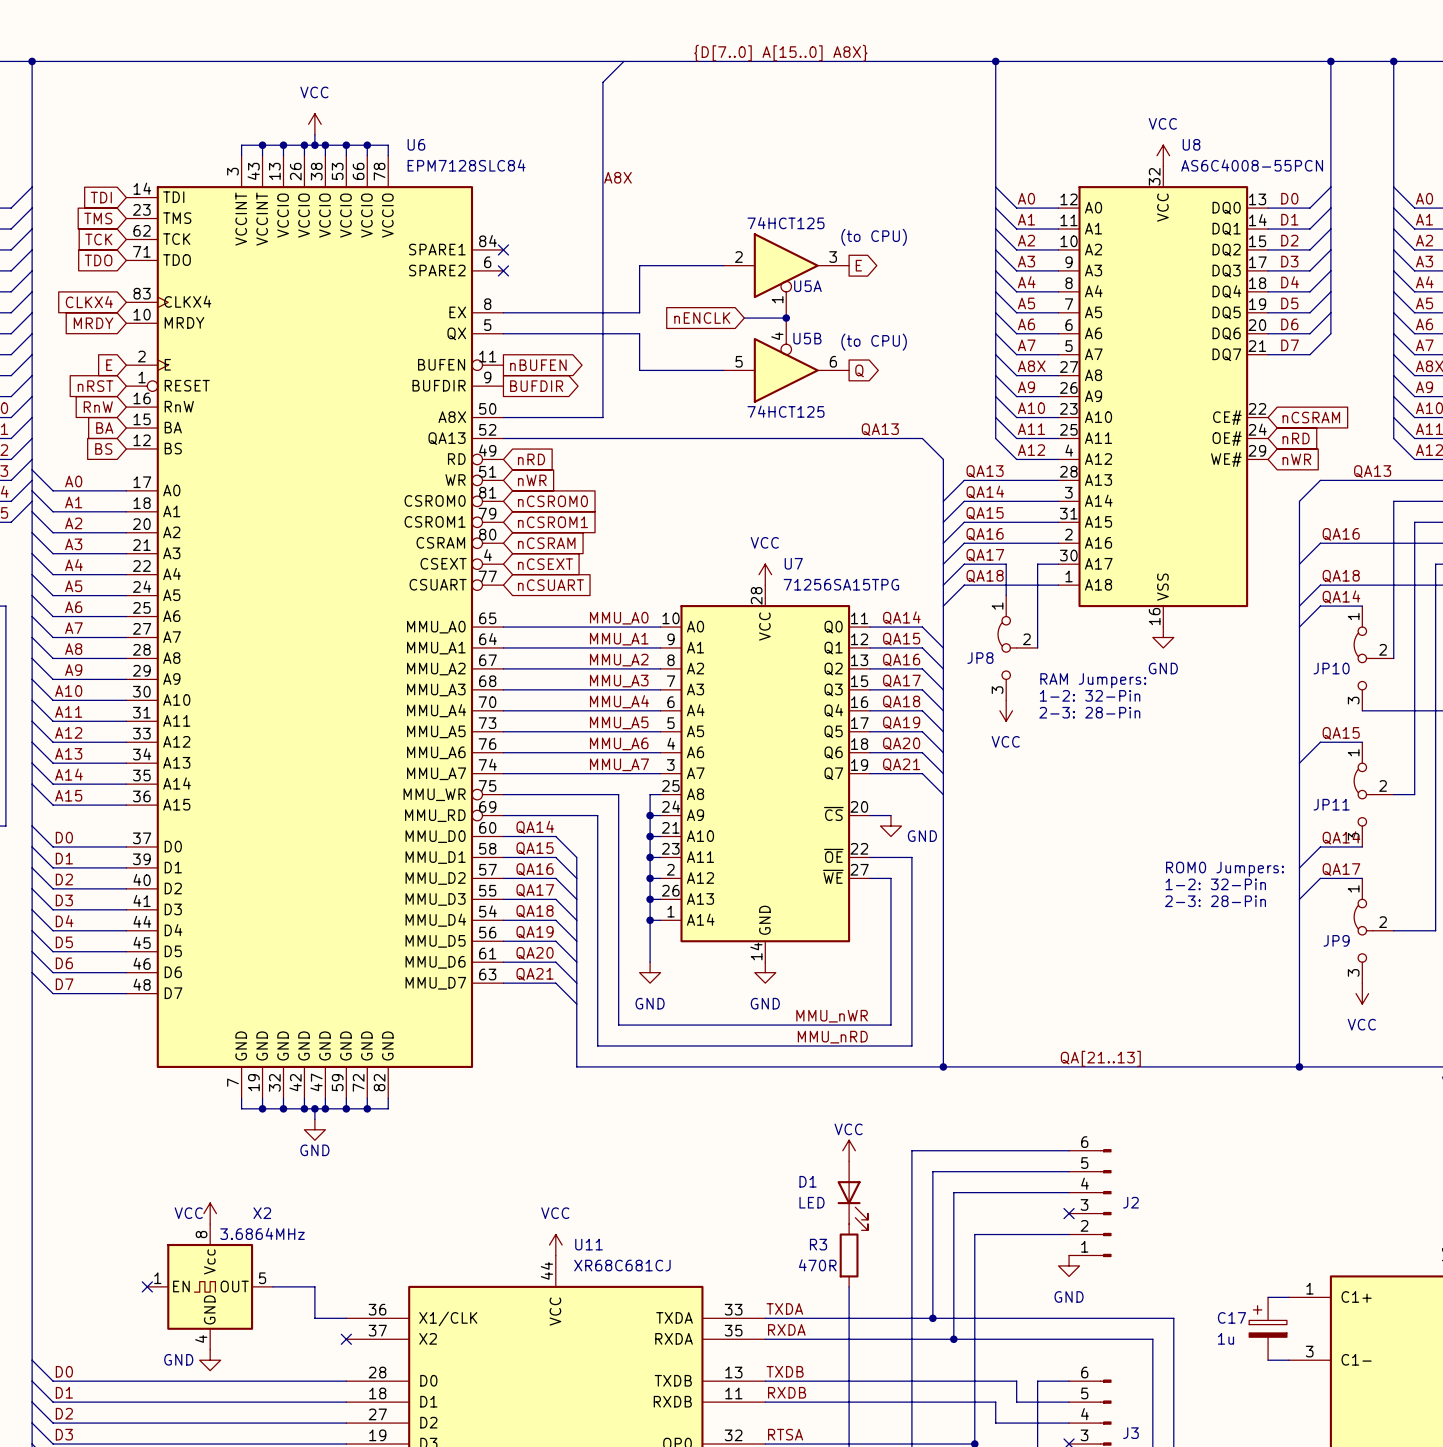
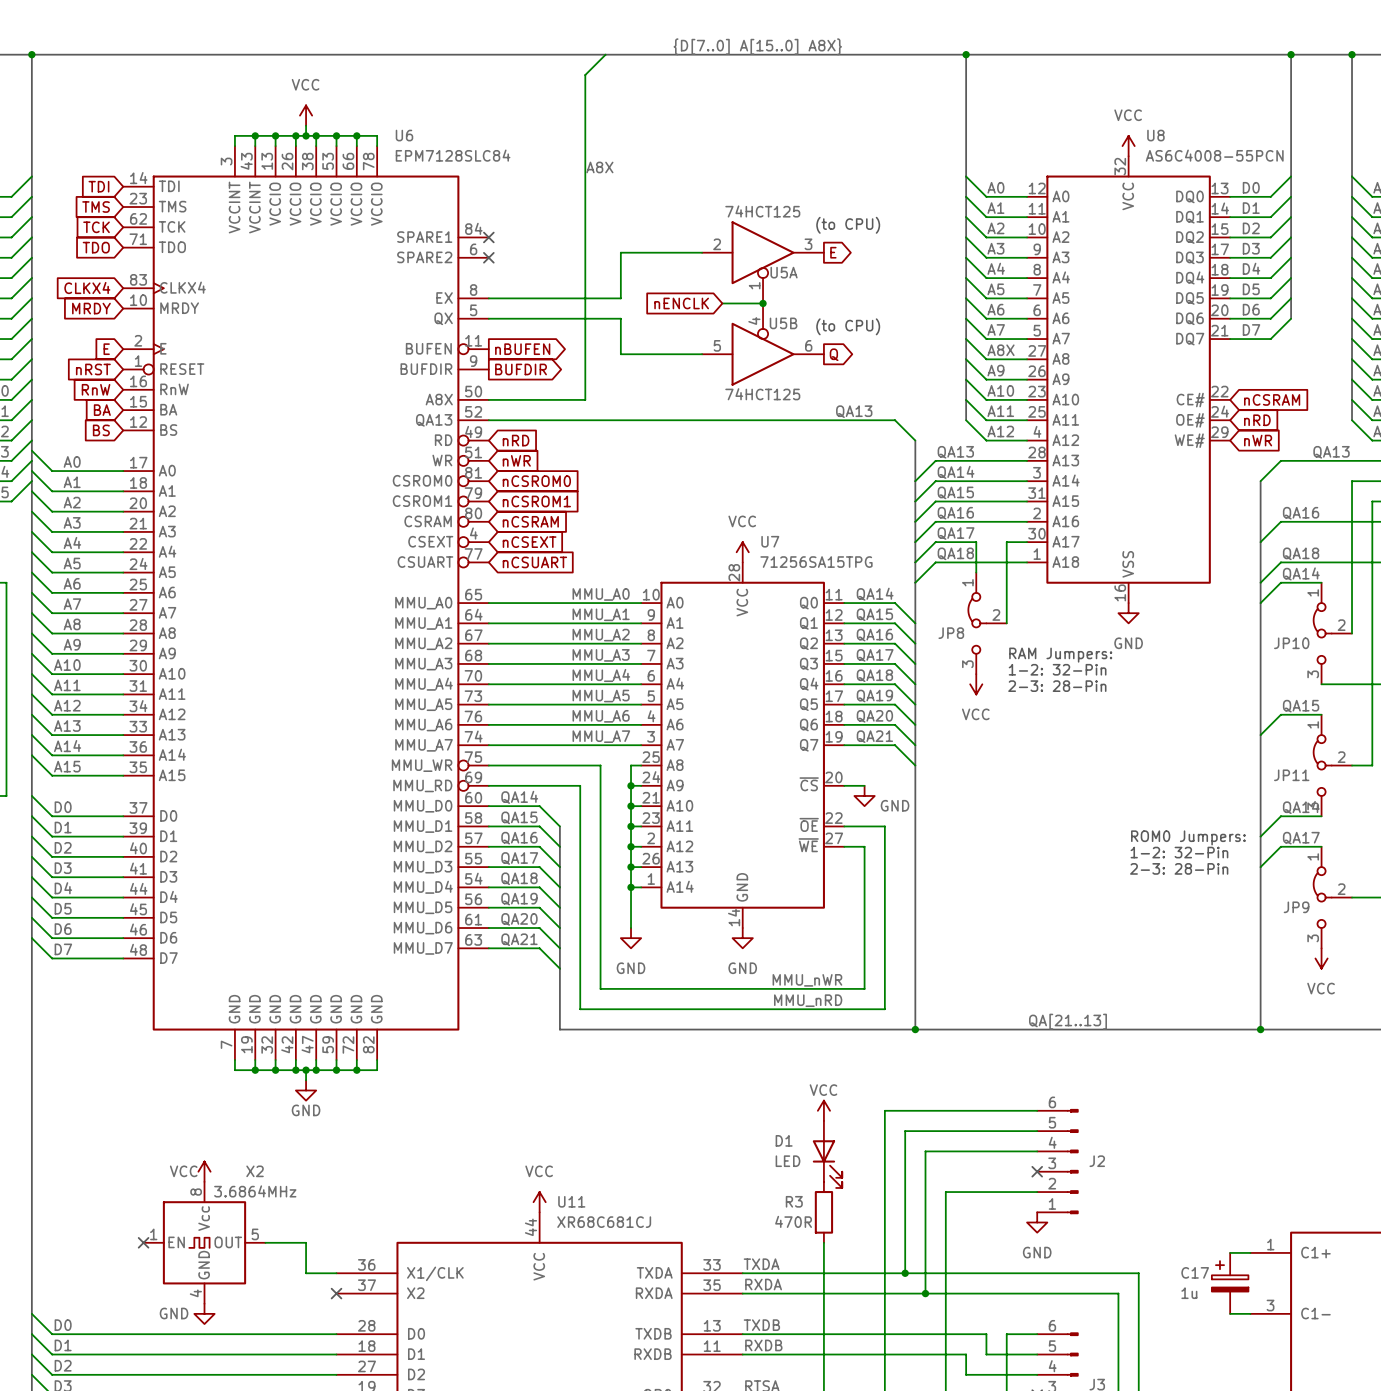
U6 pin number: 33 (141, 733) -> 34 (138, 706)
U6 pin number: 34 (142, 754) -> 33 (138, 726)
U6 pin number: 35 (141, 775) -> 36 (138, 746)
U6 pin number: 36 (141, 796) -> 35 (138, 767)

